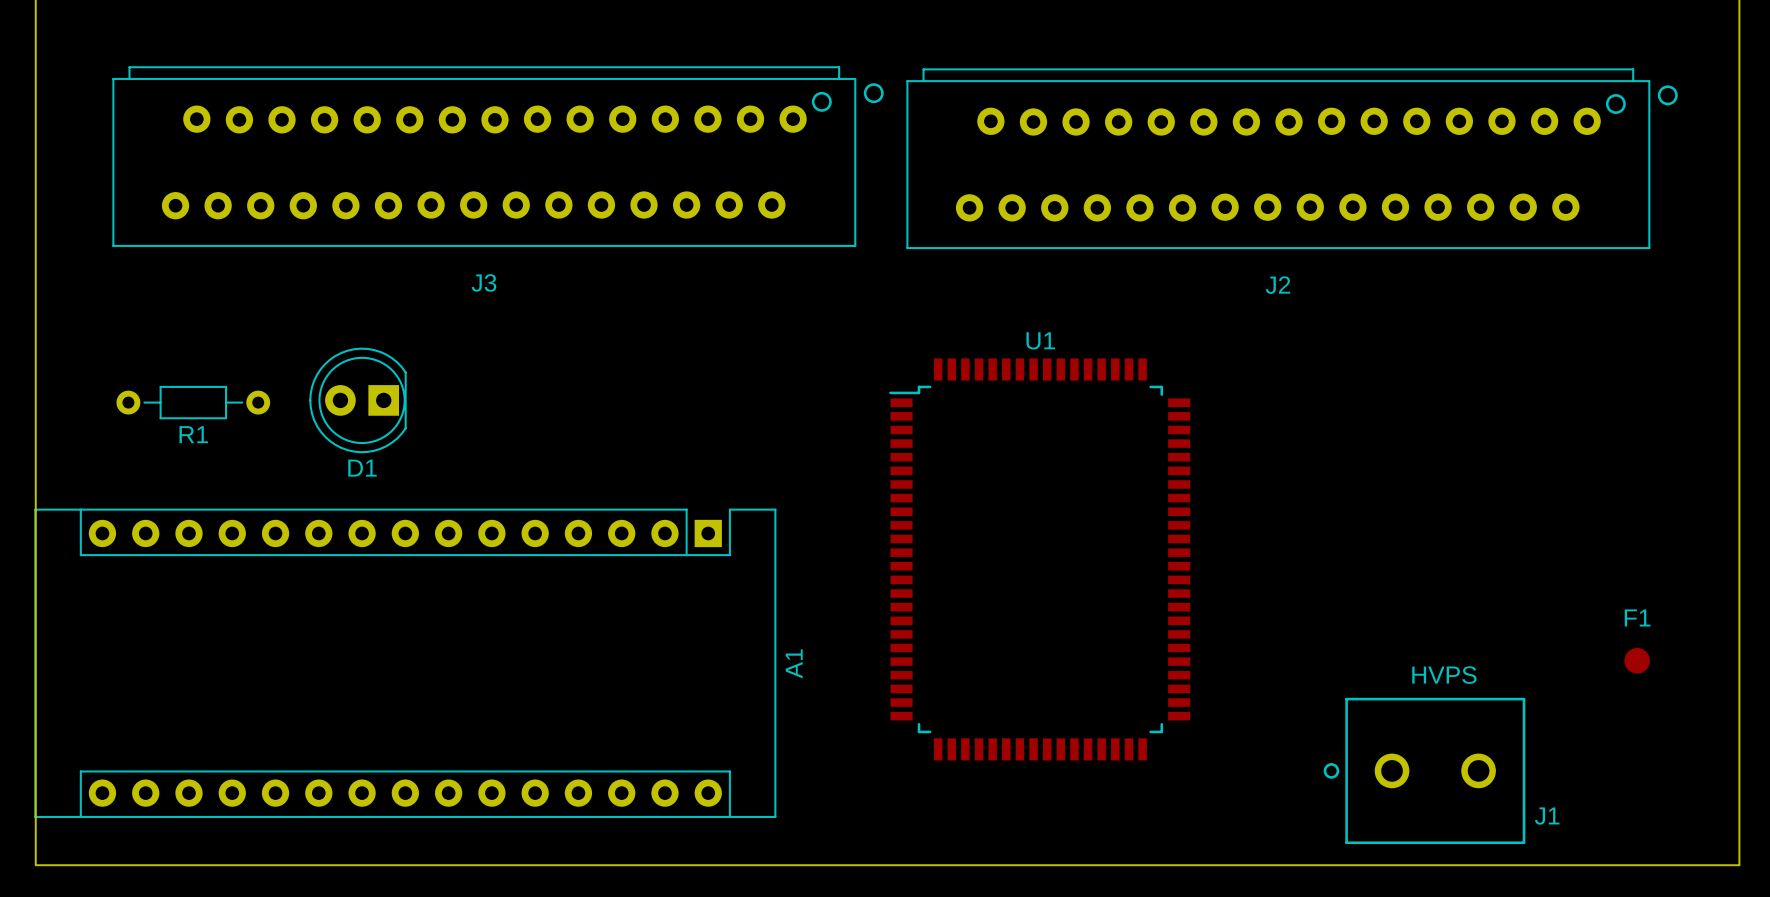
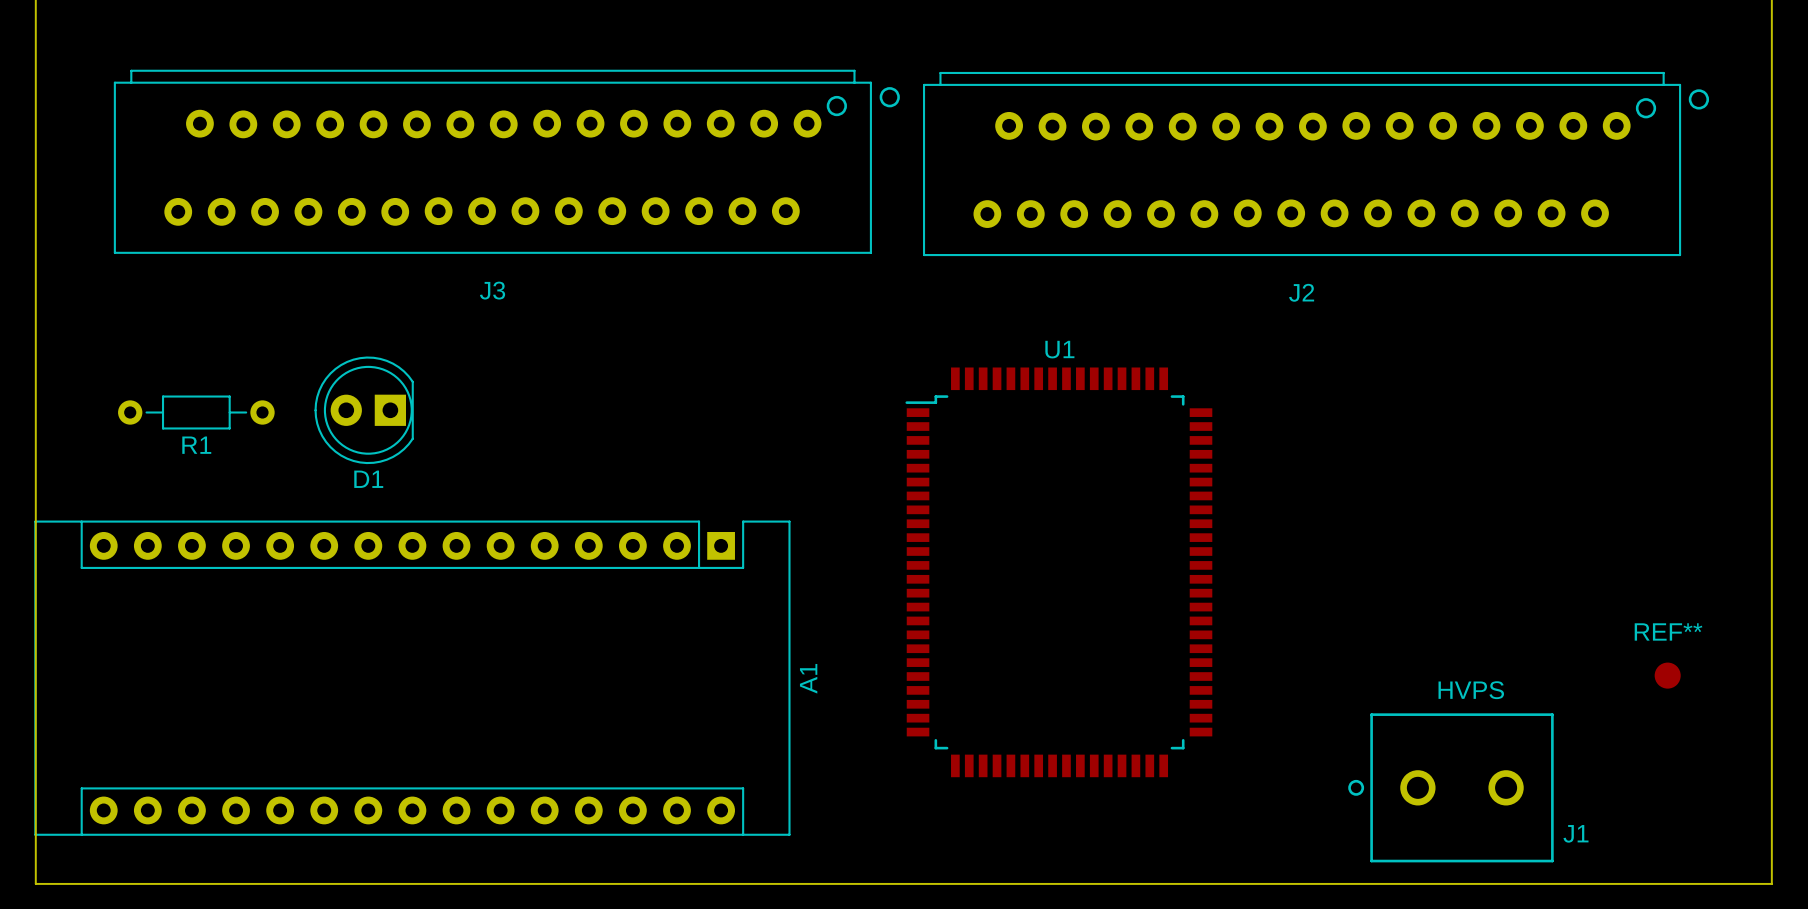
F1 name: F1 (1637, 617) -> REF** (1668, 631)

